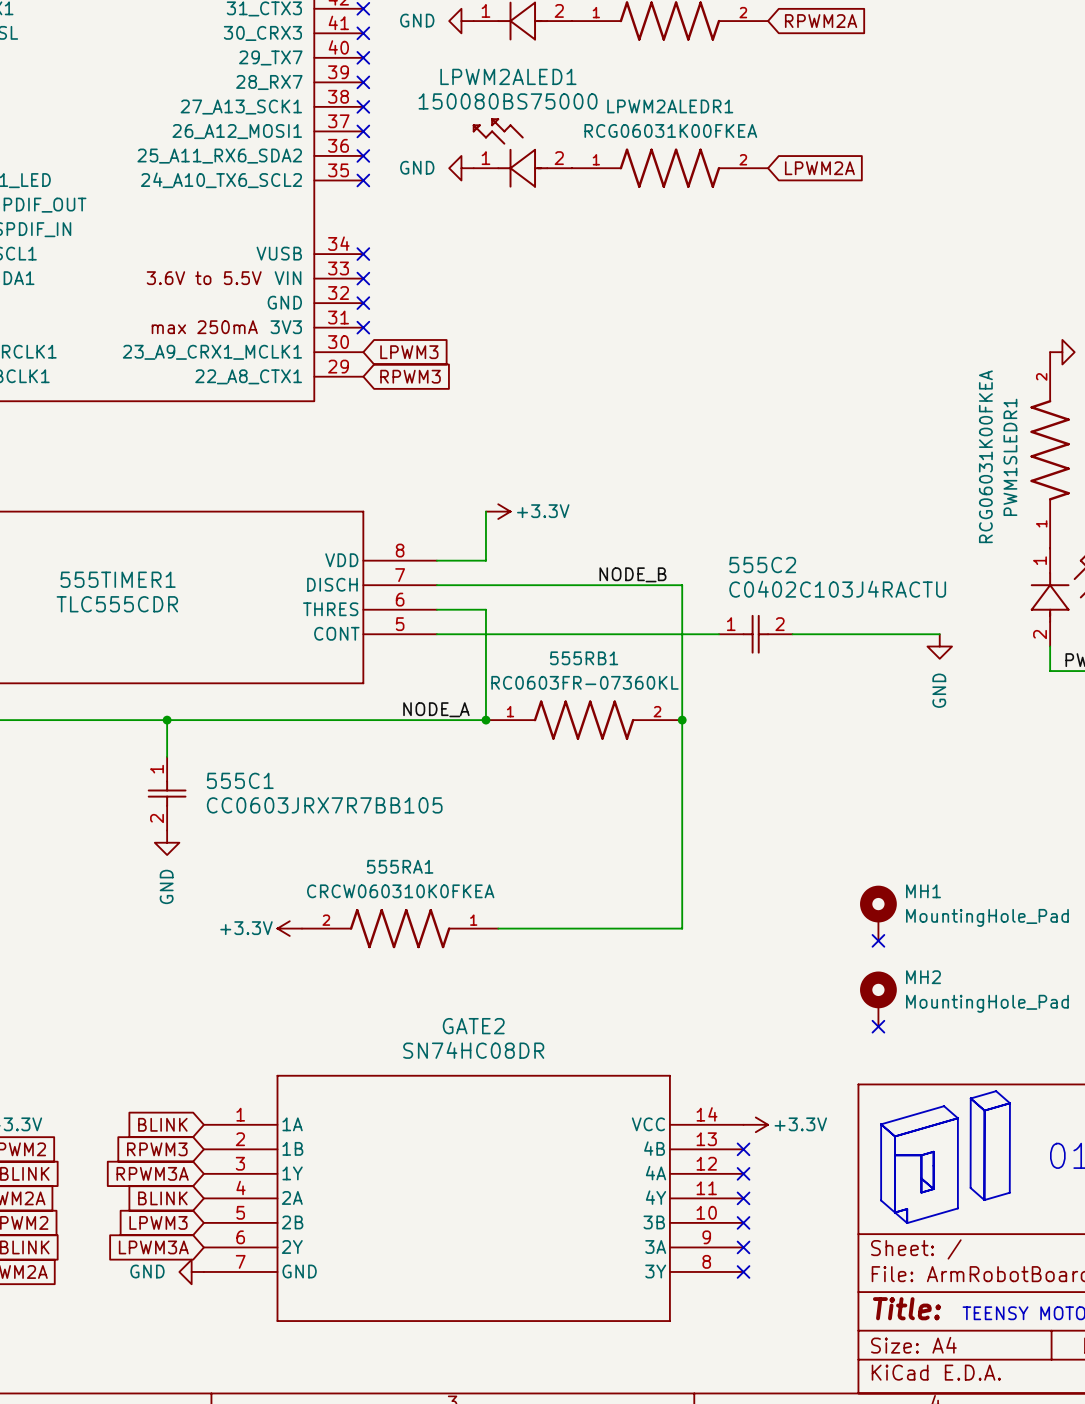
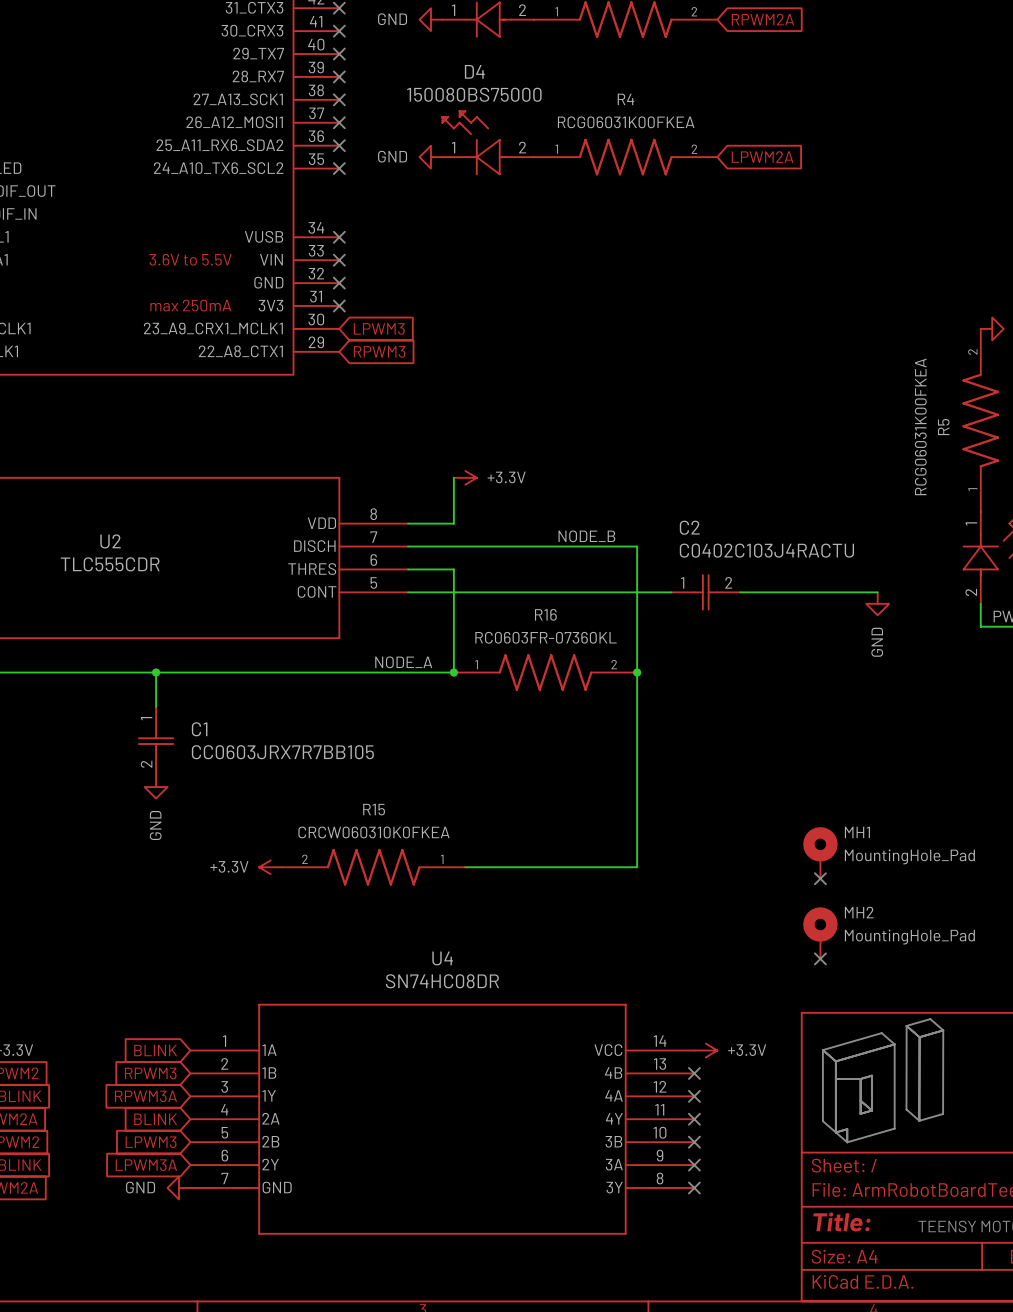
LPWM2ALED1 name: LPWM2ALED1 (508, 76) -> D4 (474, 71)
LPWM2ALEDR1 name: LPWM2ALEDR1 (670, 106) -> R4 (625, 99)
PWM1SLEDR1 name: PWM1SLEDR1 (1010, 457) -> R5 (943, 427)
555C2 name: 555C2 (762, 565) -> C2 (689, 527)
555TIMER1 name: 555TIMER1 (118, 579) -> U2 (110, 541)
555RB1 name: 555RB1 (584, 658) -> R16 (545, 614)
555C1 name: 555C1 (240, 780) -> C1 (199, 729)
555RA1 name: 555RA1 (400, 866) -> R15 (374, 809)
GATE2 name: GATE2 (473, 1026) -> U4 (442, 958)

